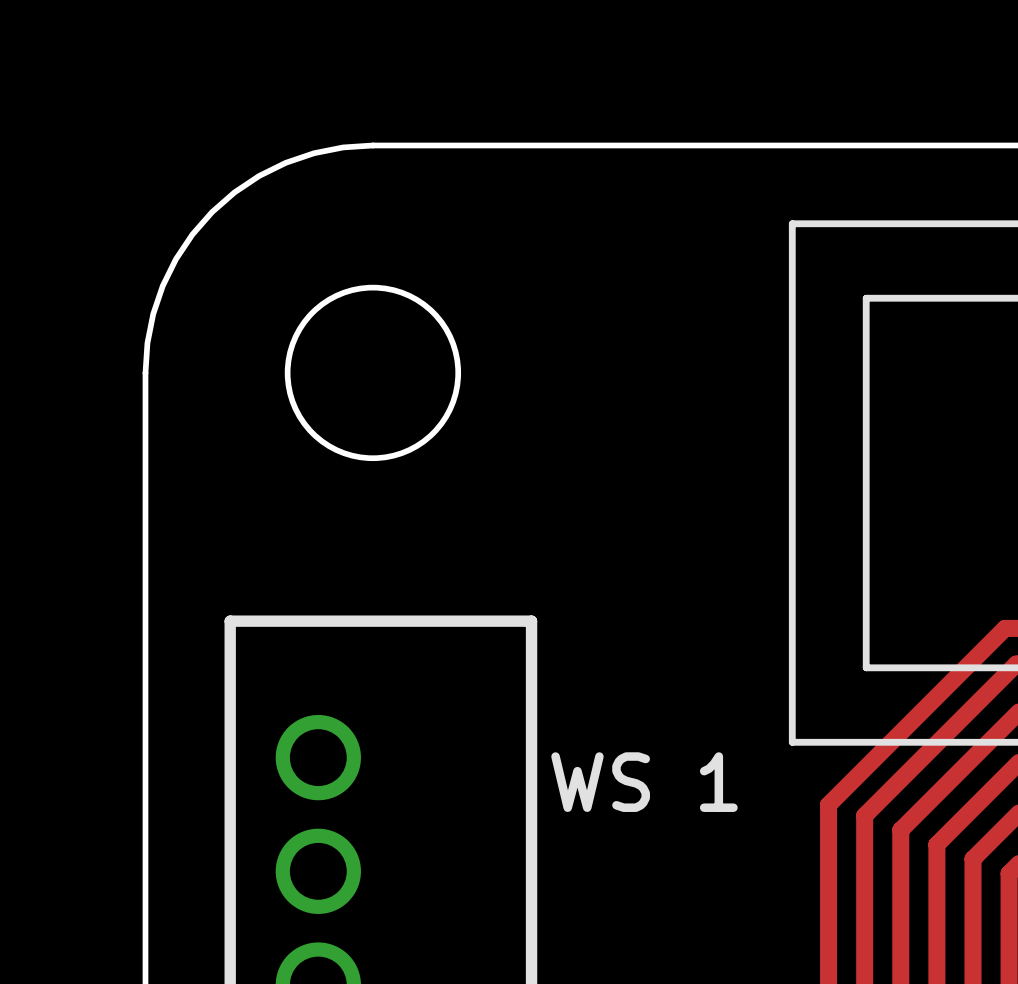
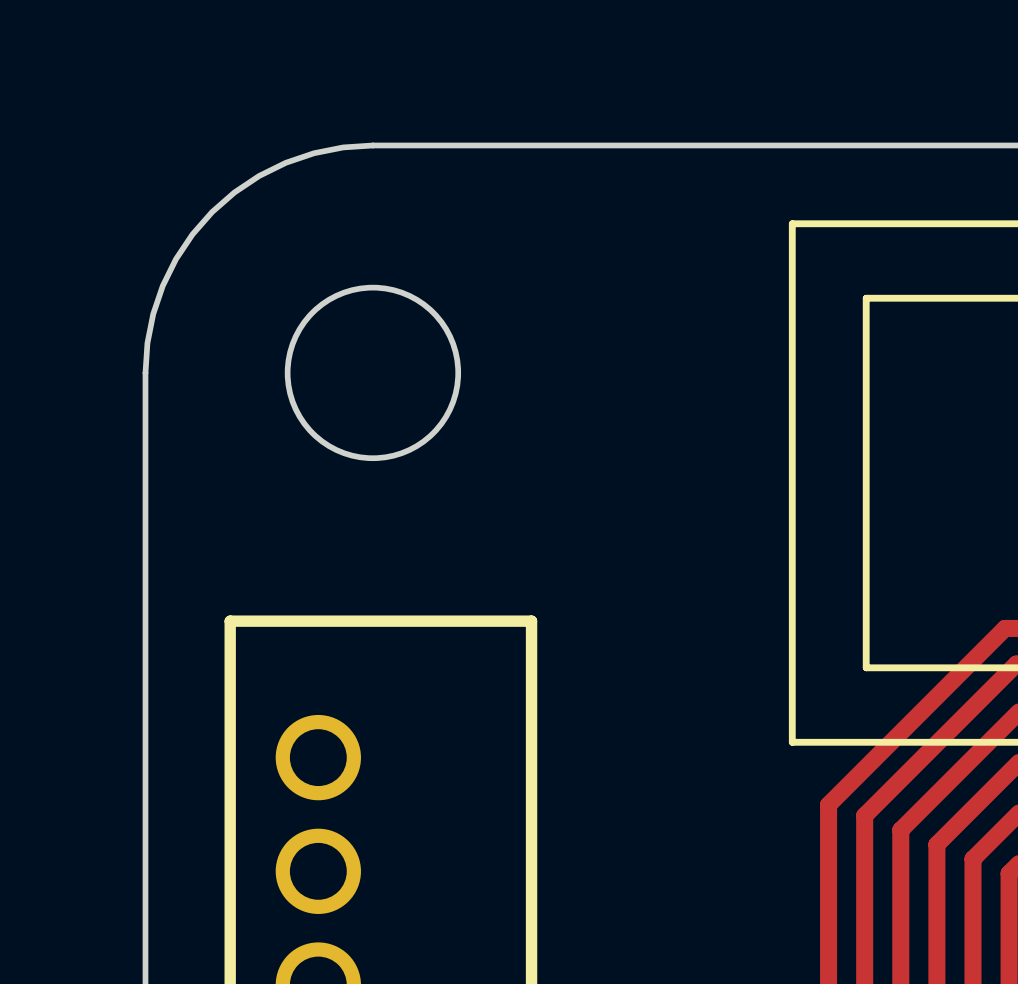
text: WS 1 (644, 782) -> none

